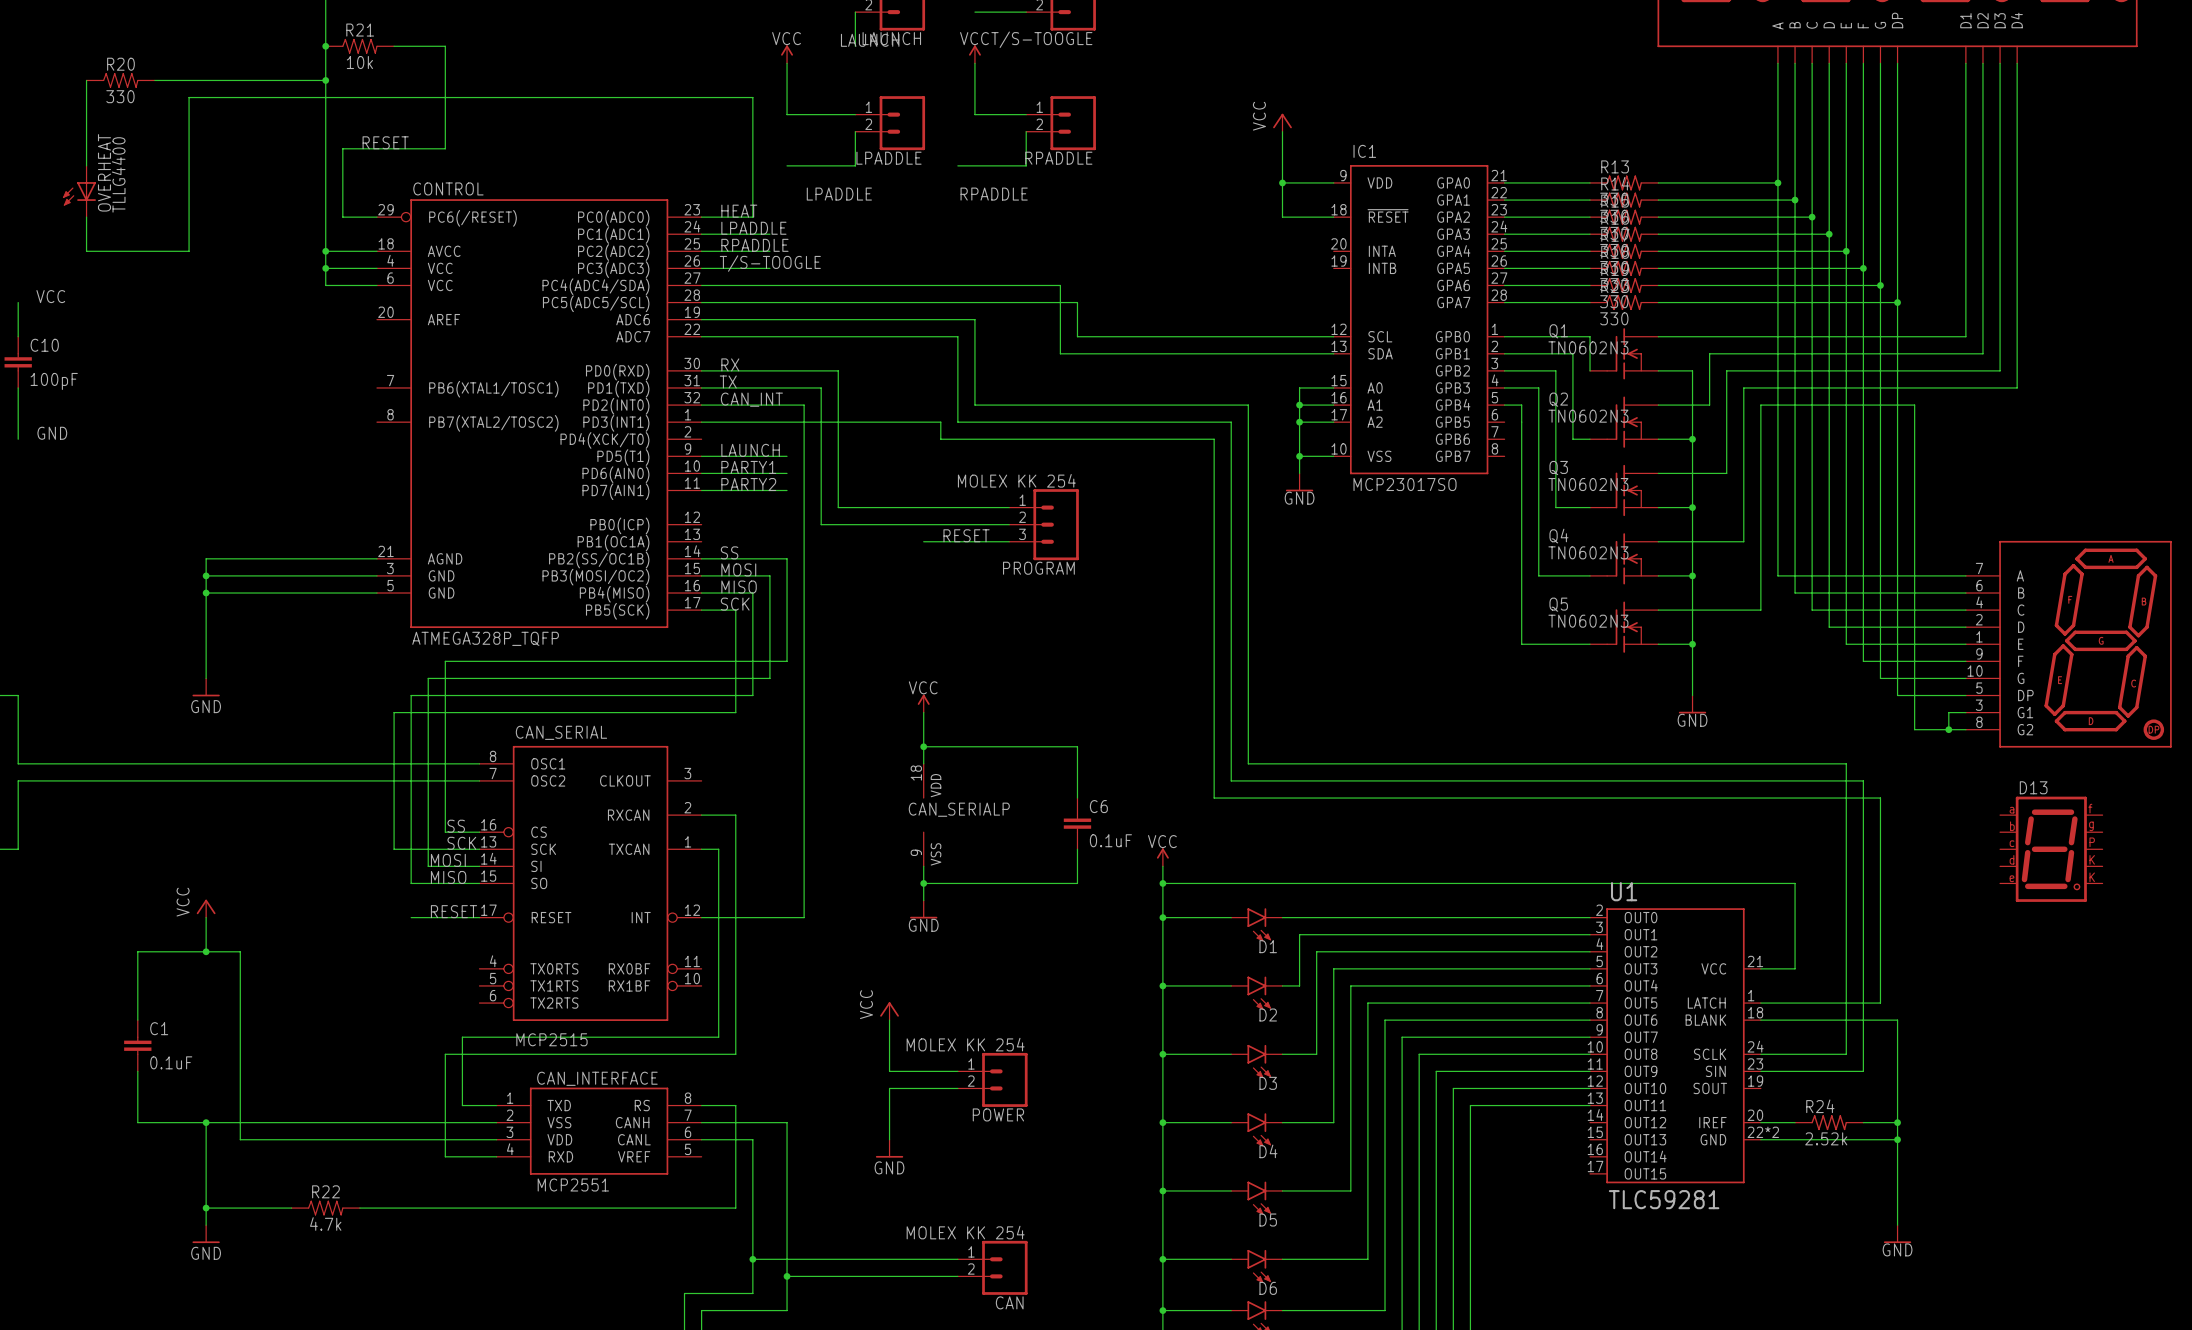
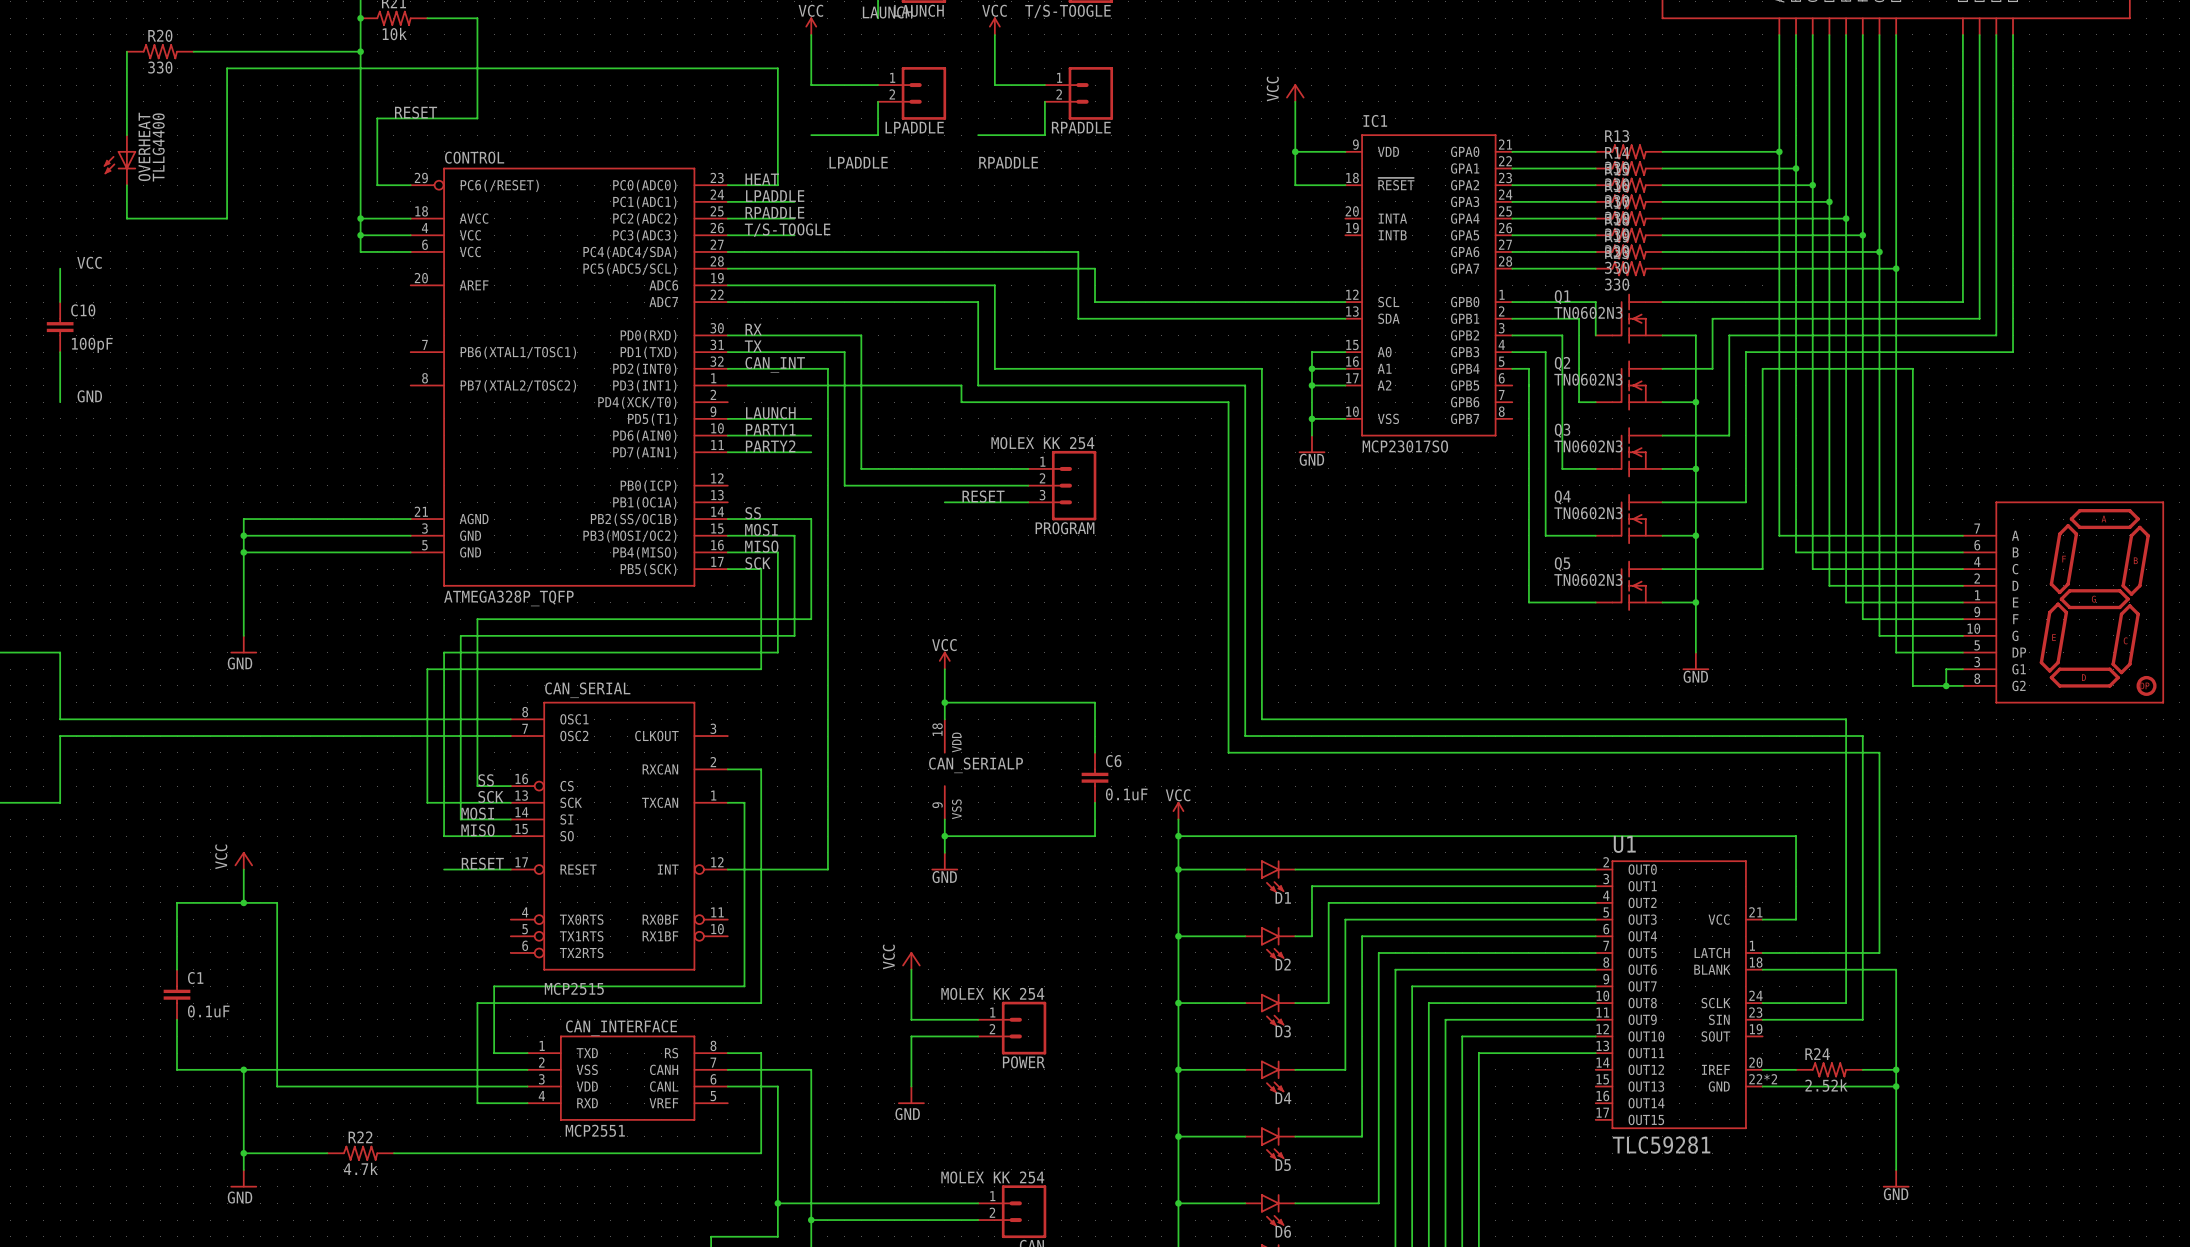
D13: (2051, 849) -> none

